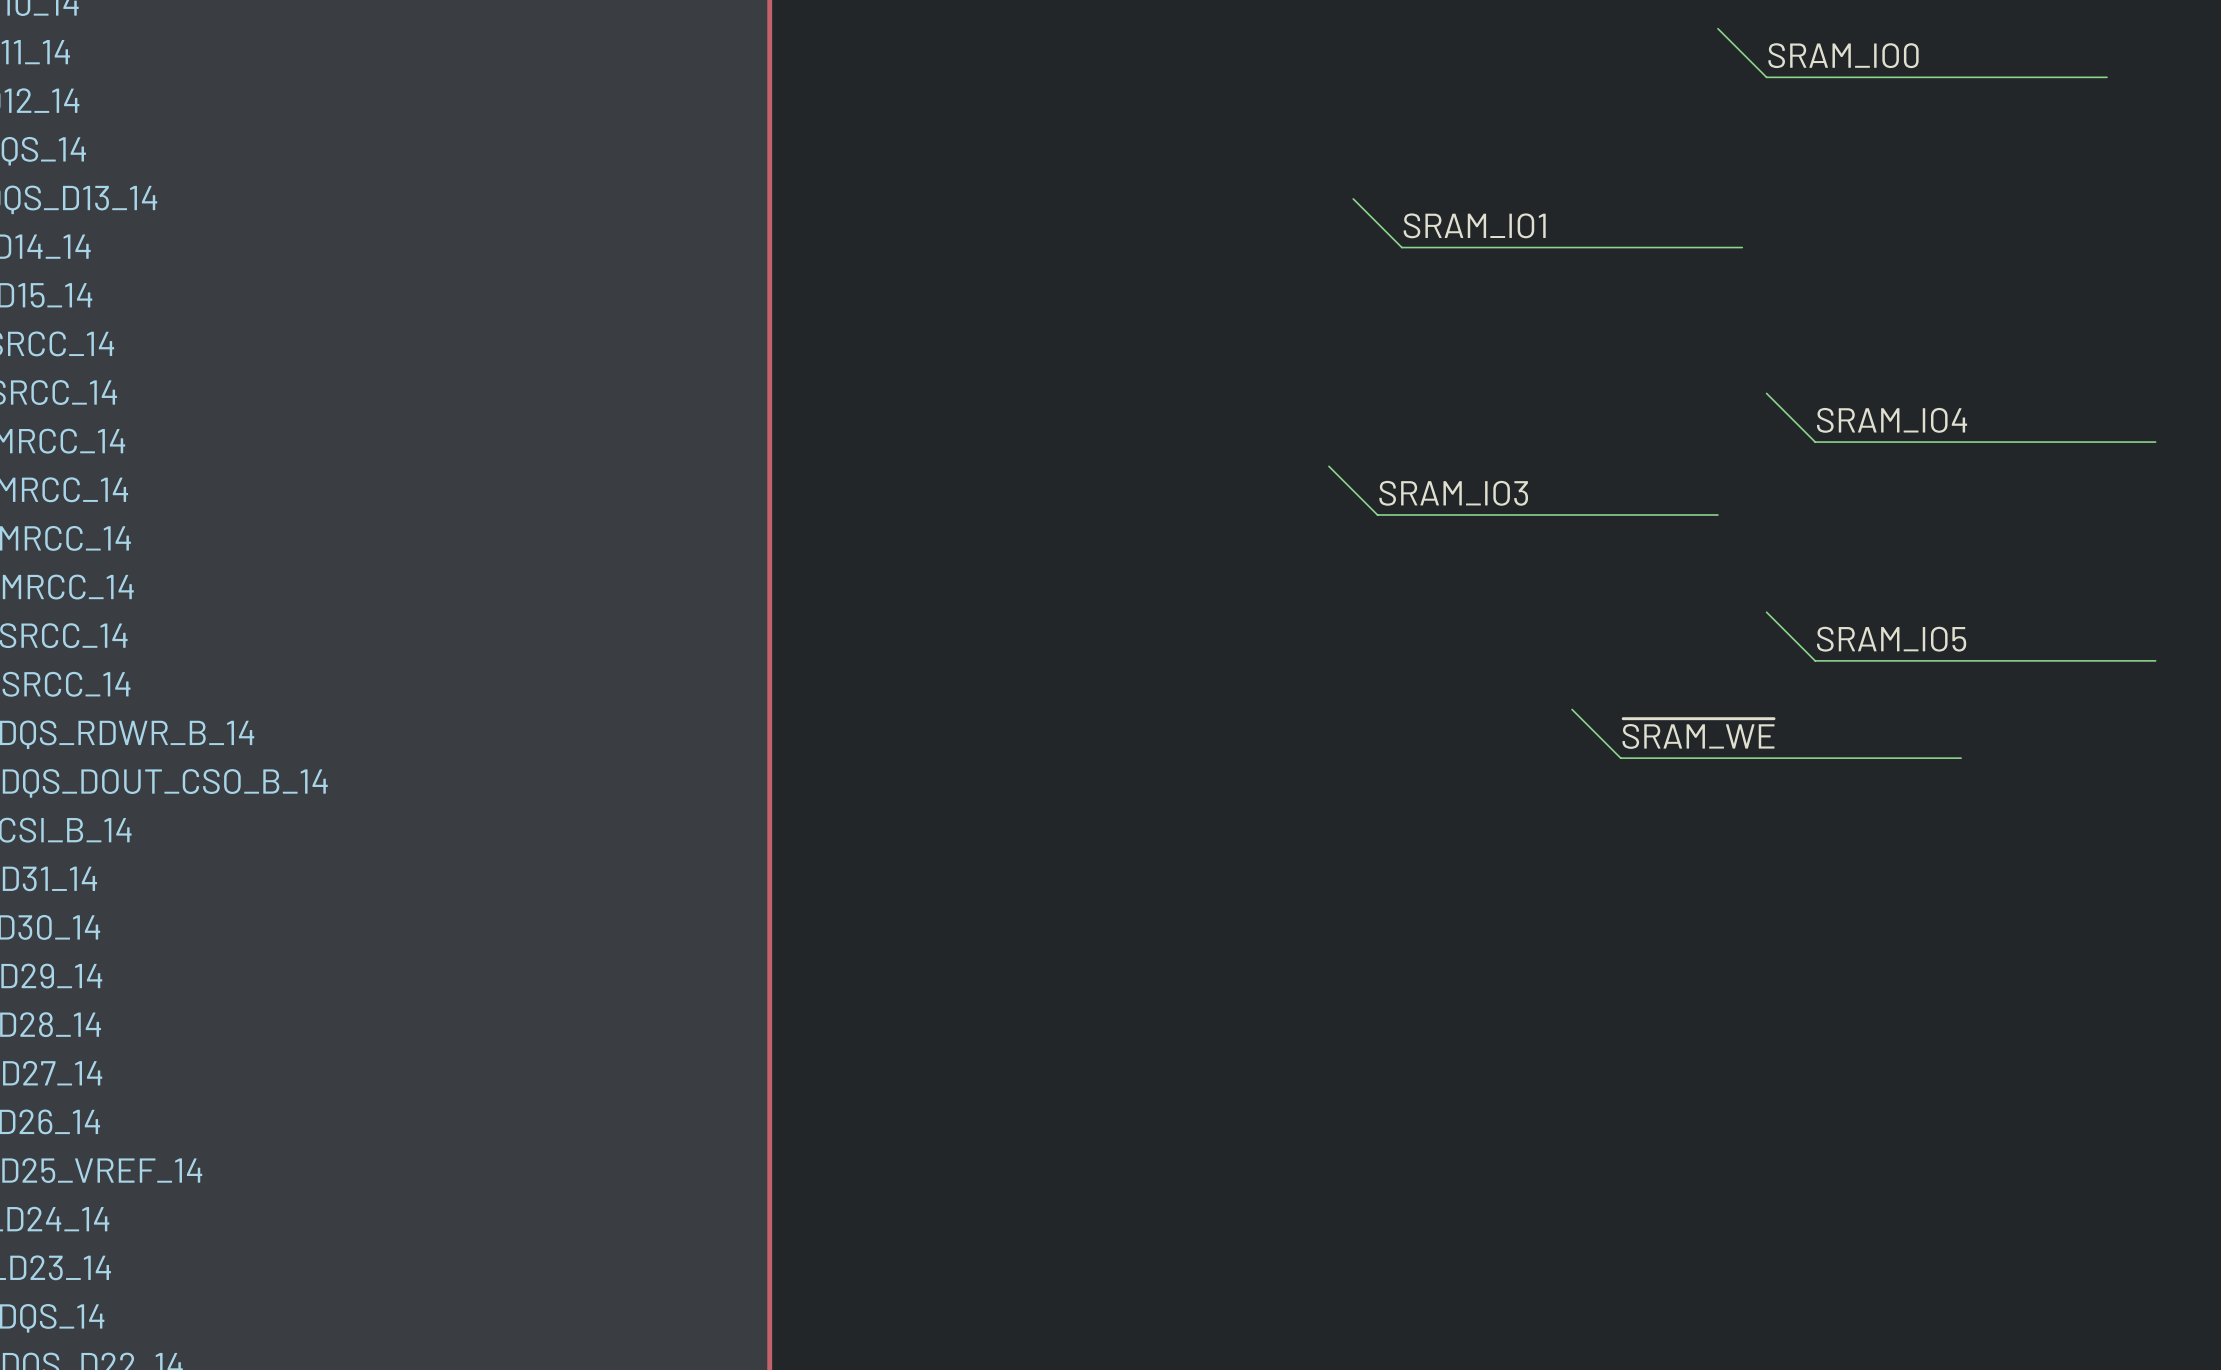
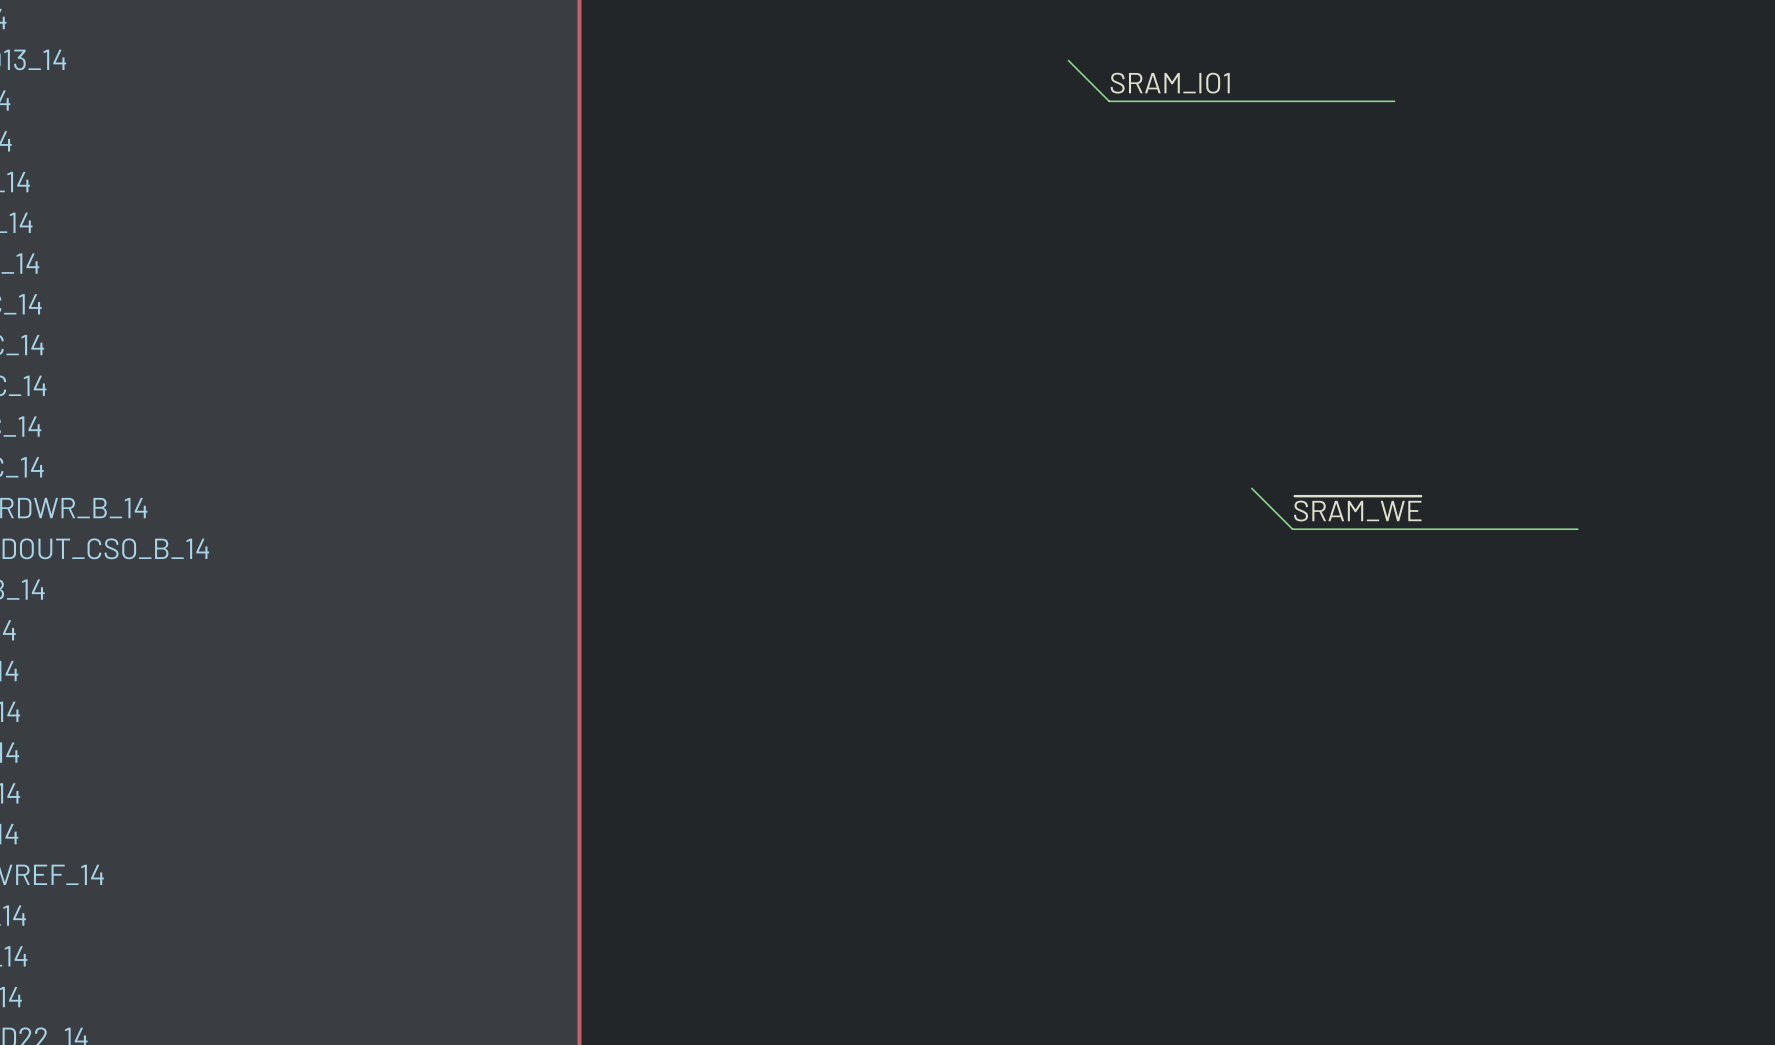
wire: (1766, 393) (1815, 442) (2155, 442) -> none
label: SRAM_IO4 (1892, 420) -> none
wire: (1328, 466) (1377, 514) (1717, 514) -> none
label: SRAM_IO3 (1453, 493) -> none
wire: (1766, 612) (1815, 660) (2155, 660) -> none
label: SRAM_IO5 (1891, 639) -> none

